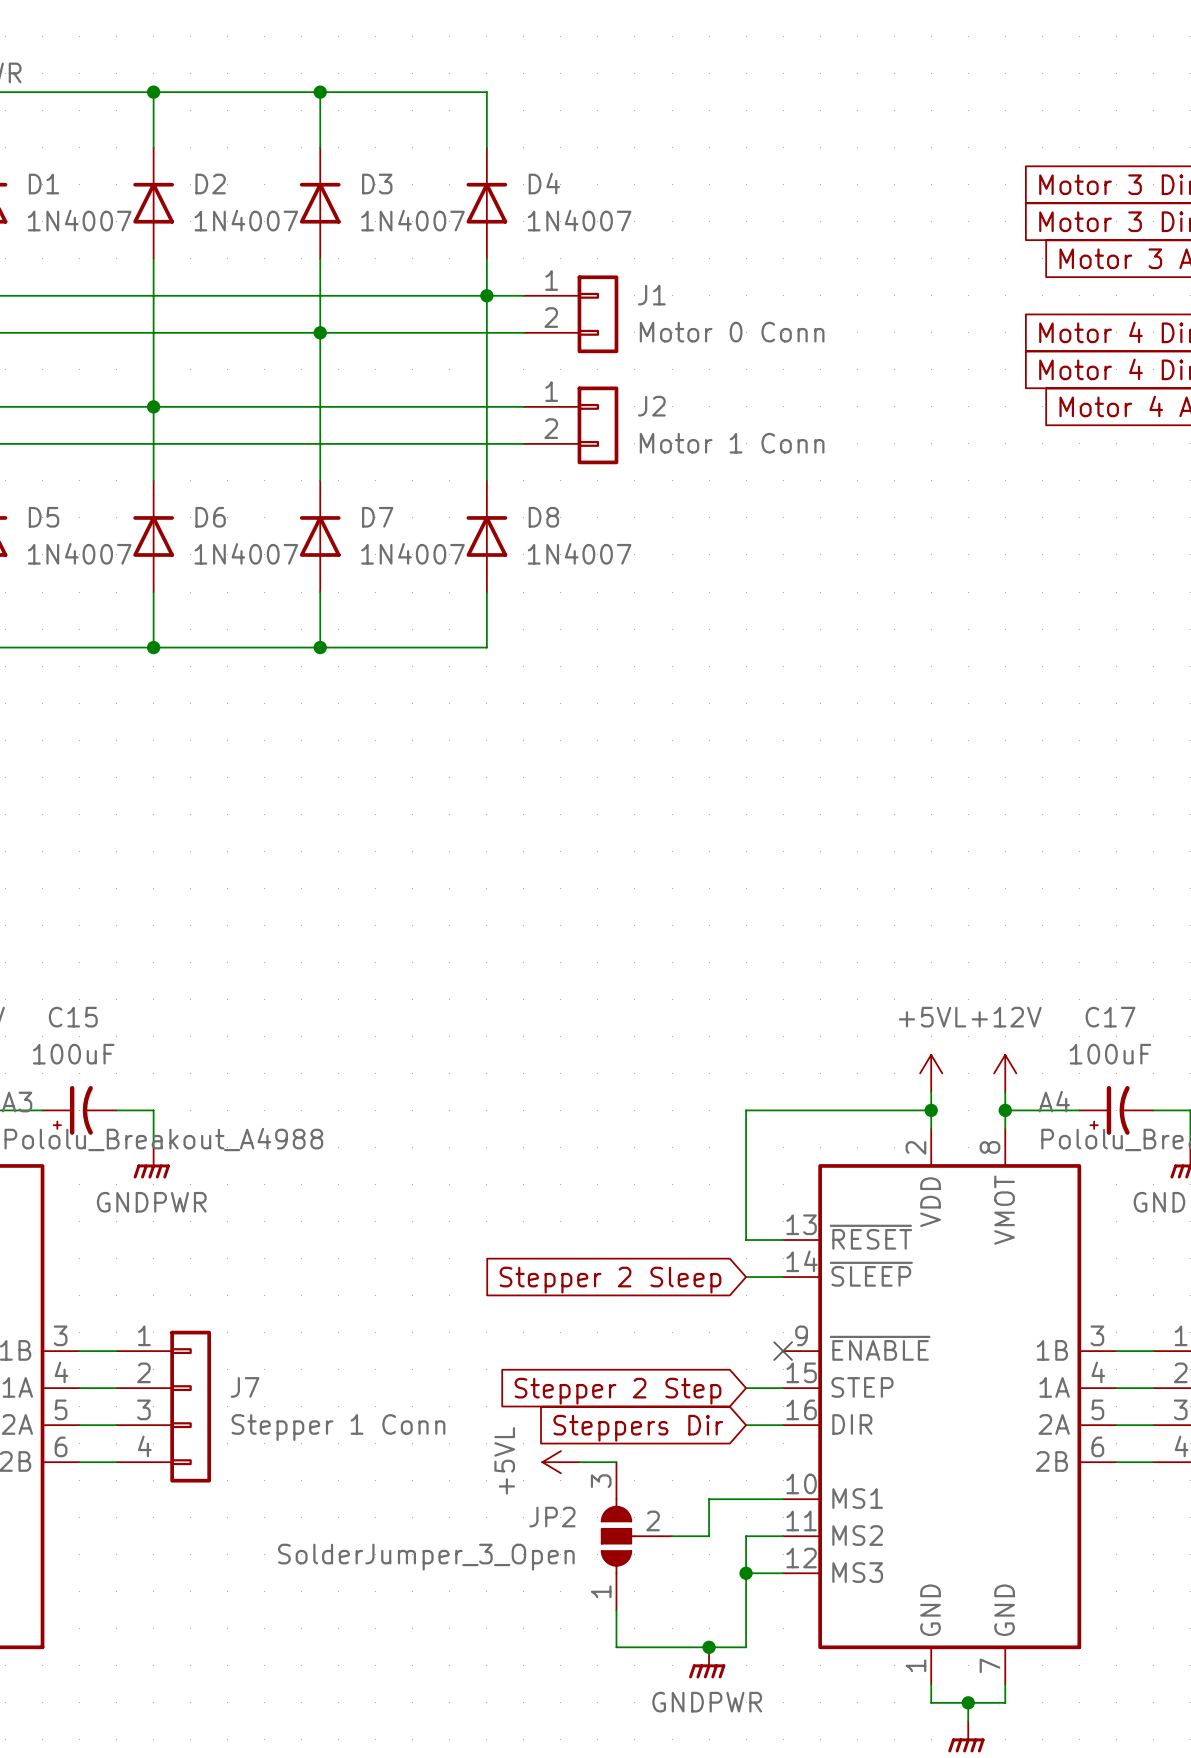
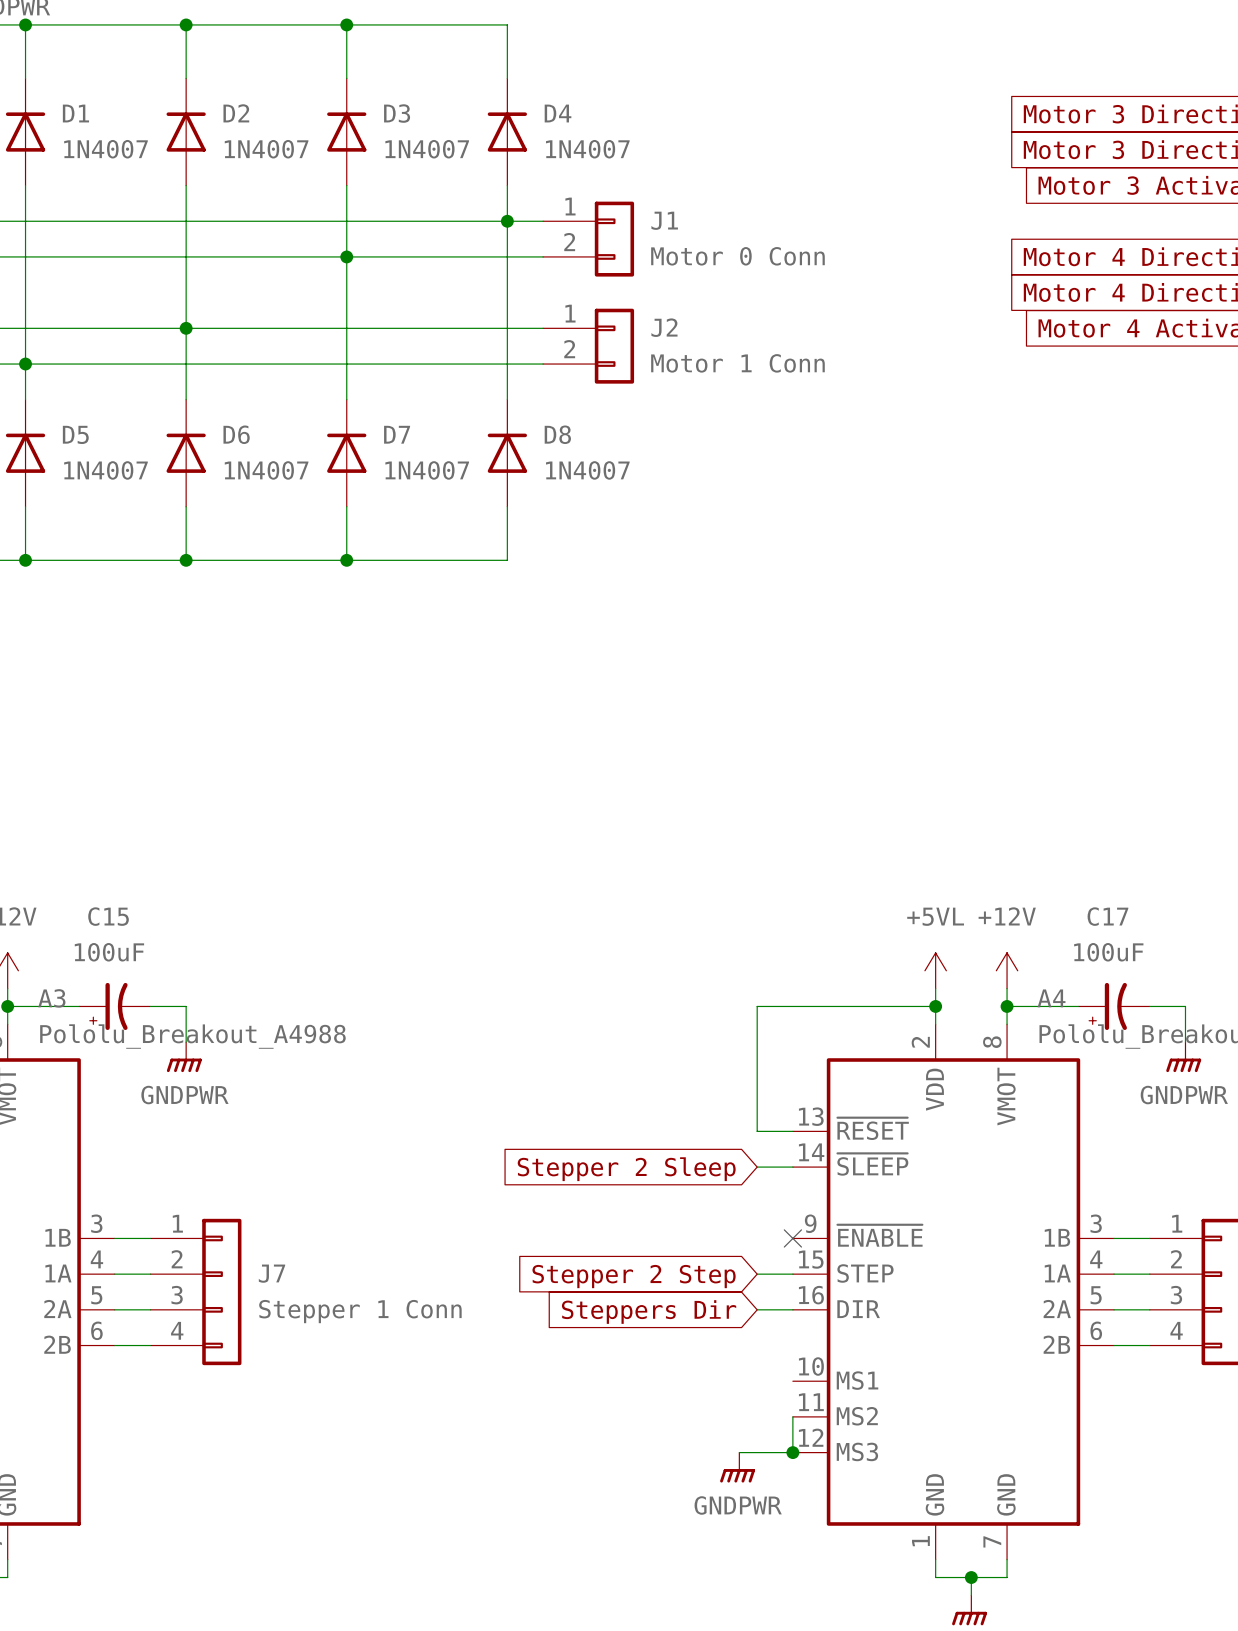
power symbol: +5VL (560, 1462) -> none
wire: (579, 1462) (616, 1462) -> none
wire: (783, 1499) (709, 1499) (709, 1536) (672, 1536) -> none
JP2: SolderJumper_3_Open (636, 1536) -> none
wire: (783, 1536) (746, 1536) (746, 1647) (616, 1647) (616, 1610) -> (792, 1416) (792, 1452)
wire: none -> (739, 1452) (757, 1452)
junction position: (746, 1573) -> (792, 1452)
junction: (709, 1647) -> none
power symbol position: GNDPWR (707, 1662) -> GNDPWR (737, 1467)

